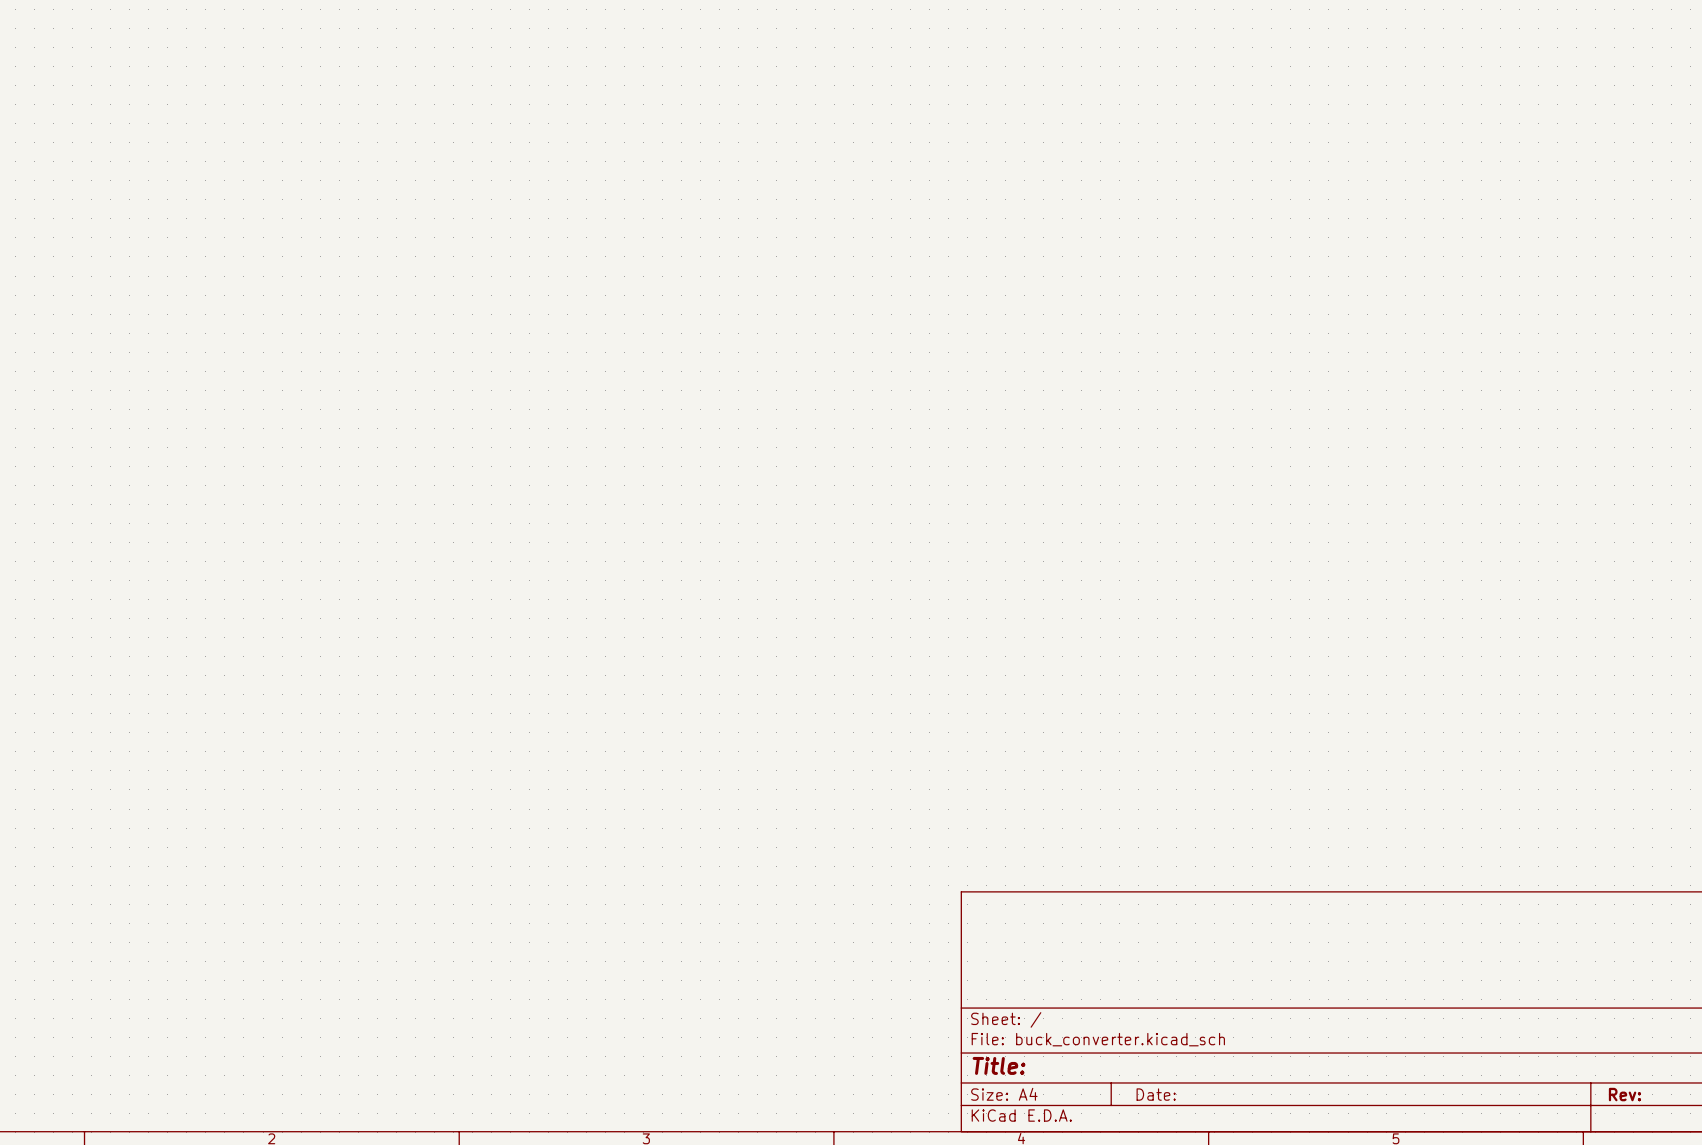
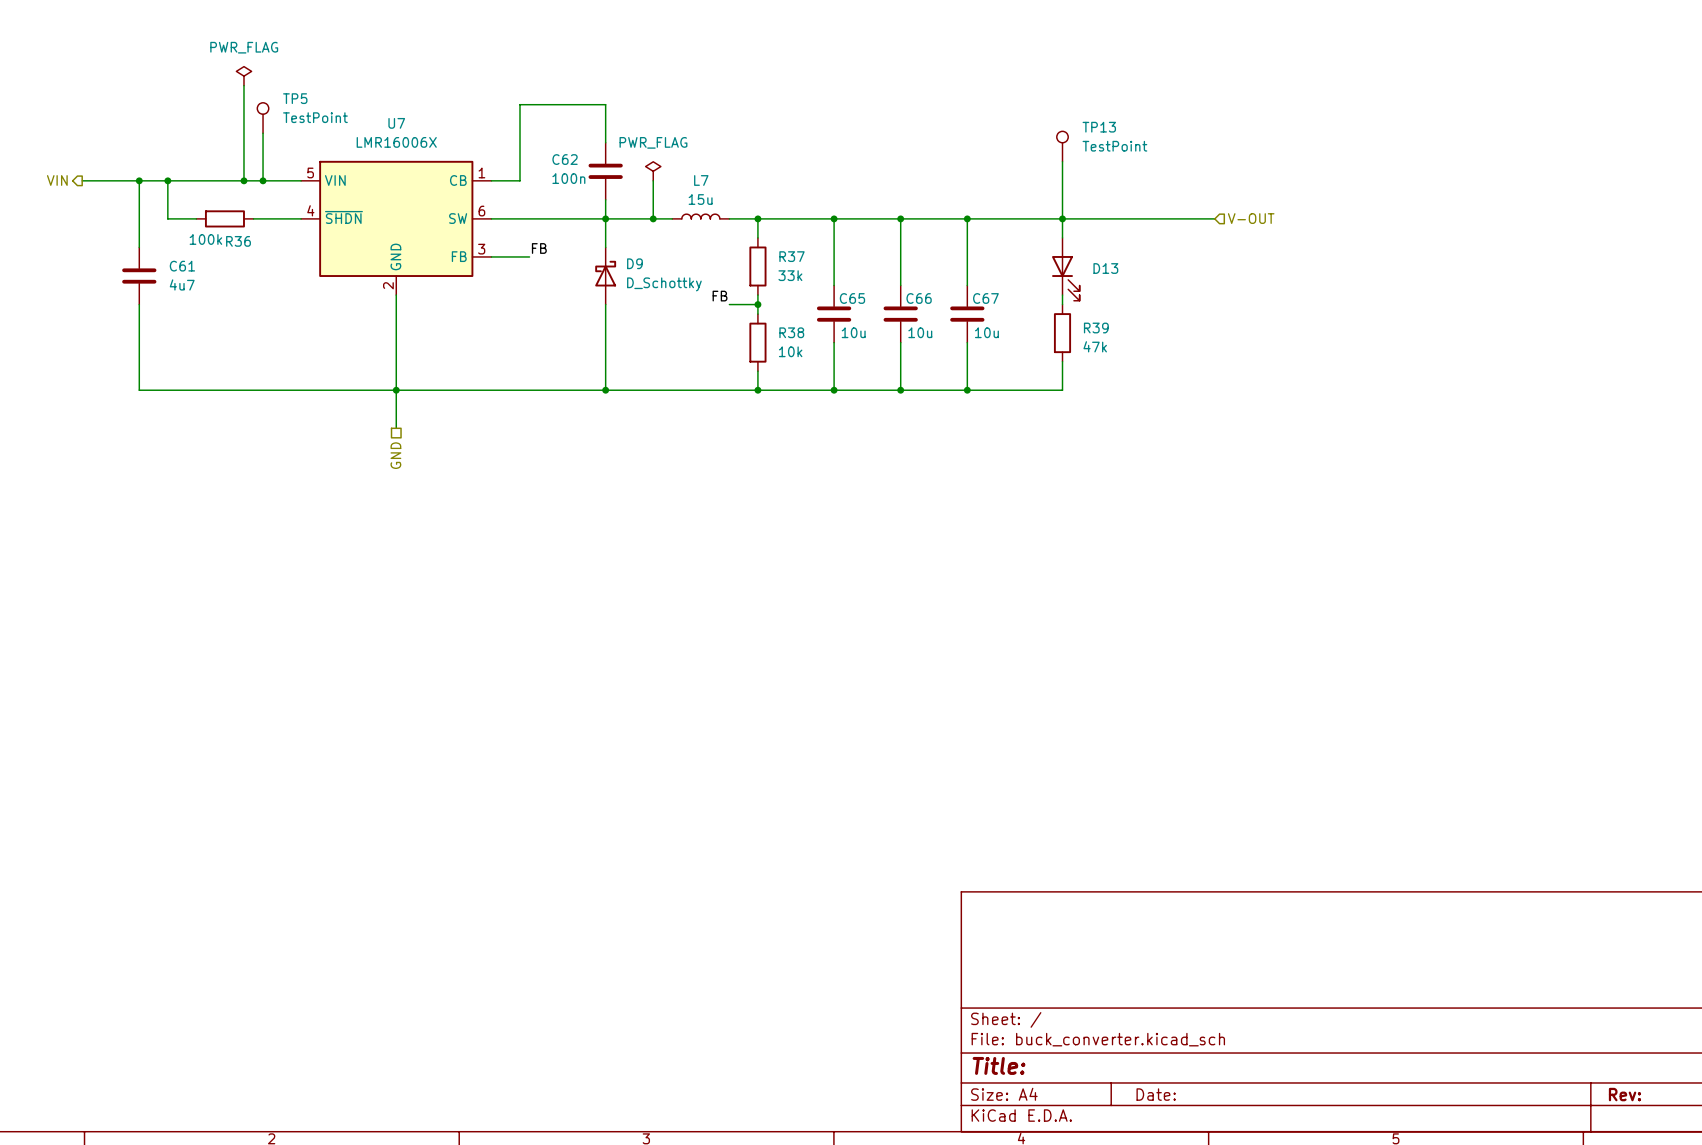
power symbol: none -> PWR_FLAG (243, 76)
wire: none -> (243, 85) (243, 180)
TP5: none -> TestPoint (263, 118)
wire: none -> (263, 133) (263, 180)
wire: none -> (605, 142) (605, 104) (520, 104) (520, 180) (491, 180)
TP13: none -> TestPoint (1062, 146)
wire: none -> (1062, 161) (1062, 237)
C62: none -> 100n (605, 171)
power symbol: none -> PWR_FLAG (653, 171)
hierarchical label: none -> VIN (57, 180)
wire: none -> (82, 180) (301, 180)
wire: none -> (139, 180) (139, 247)
junction: none -> (139, 180)
wire: none -> (167, 180) (167, 218) (196, 218)
junction: none -> (167, 180)
junction: none -> (243, 180)
junction: none -> (263, 180)
wire: none -> (653, 180) (653, 218)
wire: none -> (605, 199) (605, 247)
L7: none -> 15u (700, 216)
R36: none -> 100k (224, 218)
wire: none -> (253, 218) (301, 218)
wire: none -> (491, 218) (672, 218)
junction: none -> (605, 218)
junction: none -> (653, 218)
wire: none -> (729, 218) (1214, 218)
wire: none -> (757, 218) (757, 237)
junction: none -> (757, 218)
wire: none -> (834, 218) (834, 285)
junction: none -> (834, 218)
wire: none -> (900, 218) (900, 285)
junction: none -> (900, 218)
wire: none -> (967, 218) (967, 285)
junction: none -> (967, 218)
junction: none -> (1062, 218)
hierarchical label: none -> V-OUT (1251, 218)
U7: none -> LMR16006X (396, 227)
label: none -> FB (539, 248)
wire: none -> (491, 256) (529, 256)
R37: none -> 33k (757, 266)
D13: none -> (1065, 269)
C61: none -> 4u7 (139, 276)
D9: none -> D_Schottky (605, 276)
wire: none -> (396, 295) (396, 428)
wire: none -> (757, 295) (757, 314)
wire: none -> (1062, 295) (1062, 304)
label: none -> FB (720, 296)
wire: none -> (139, 304) (139, 390) (1062, 390) (1062, 361)
wire: none -> (605, 304) (605, 390)
wire: none -> (729, 304) (757, 304)
junction: none -> (757, 304)
C65: none -> 10u (834, 314)
C66: none -> 10u (900, 314)
C67: none -> 10u (967, 314)
R39: none -> 47k (1062, 333)
R38: none -> 10k (757, 342)
wire: none -> (834, 342) (834, 390)
wire: none -> (900, 342) (900, 390)
wire: none -> (967, 342) (967, 390)
wire: none -> (757, 371) (757, 390)
junction: none -> (396, 390)
junction: none -> (605, 390)
junction: none -> (757, 390)
junction: none -> (834, 390)
junction: none -> (900, 390)
junction: none -> (967, 390)
hierarchical label: none -> GND (395, 455)

